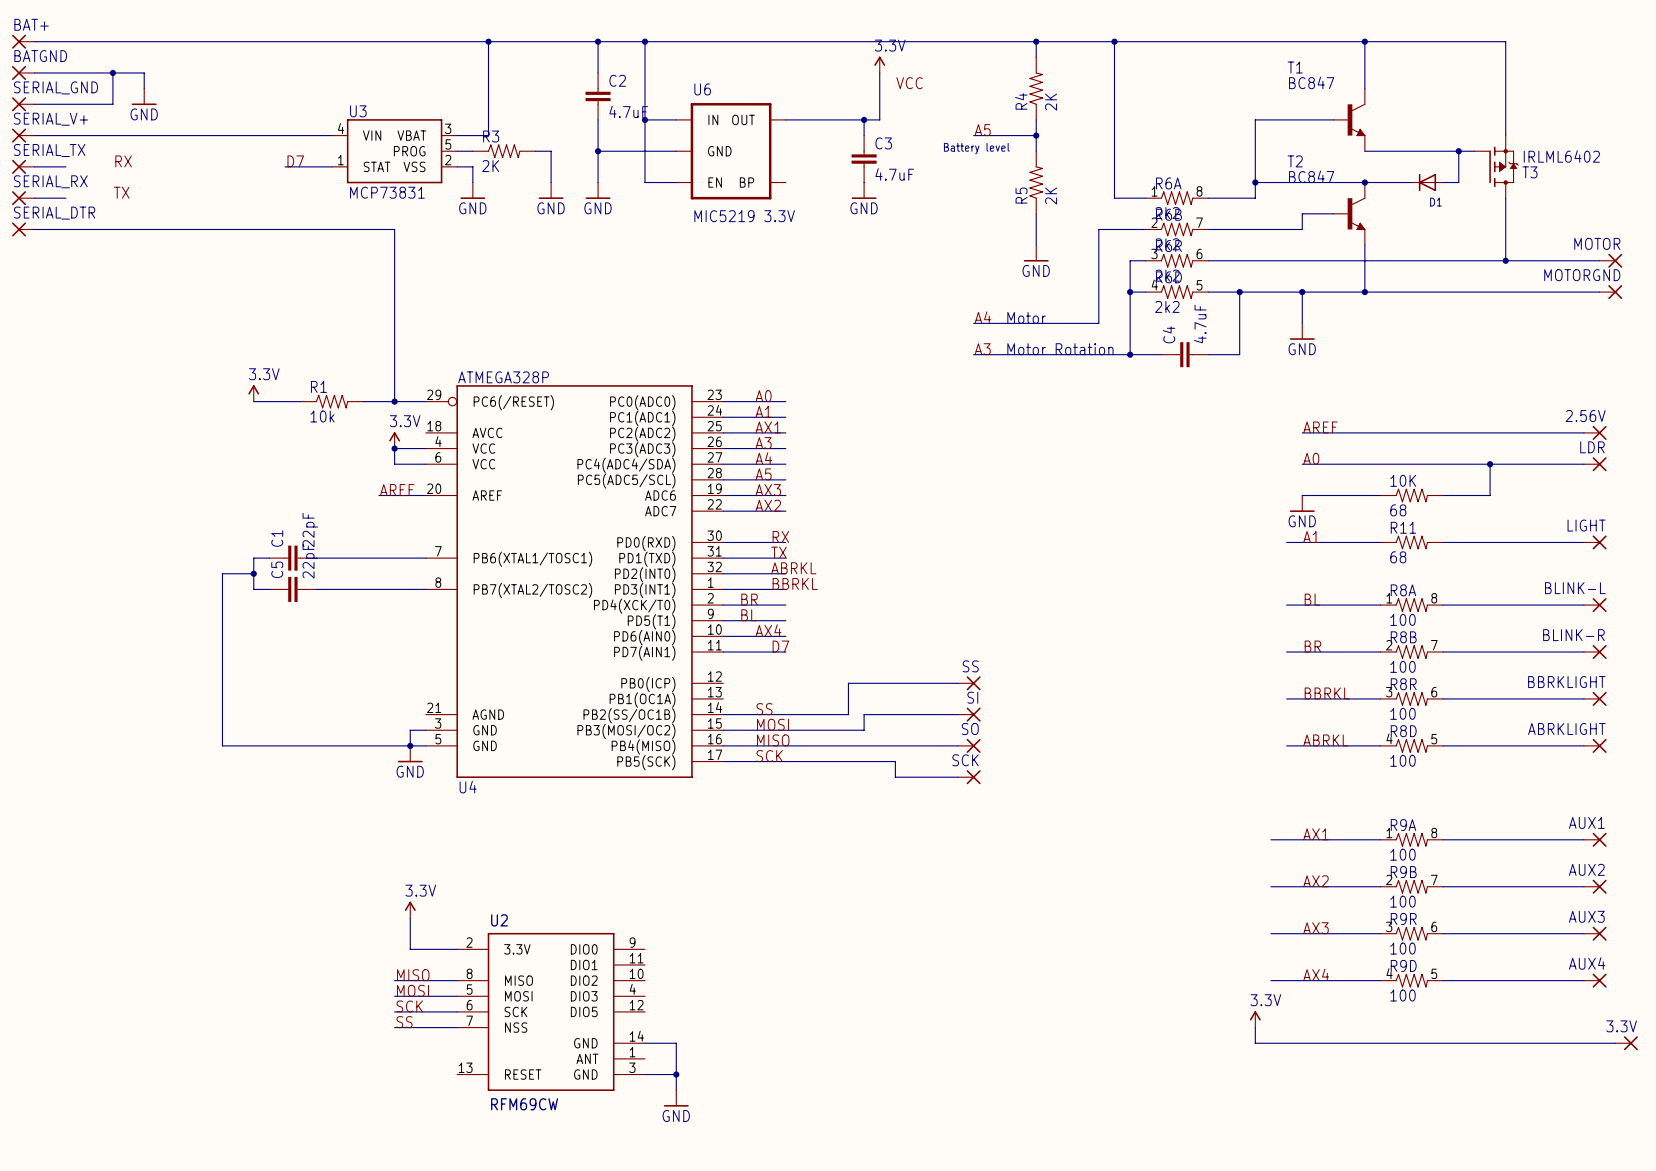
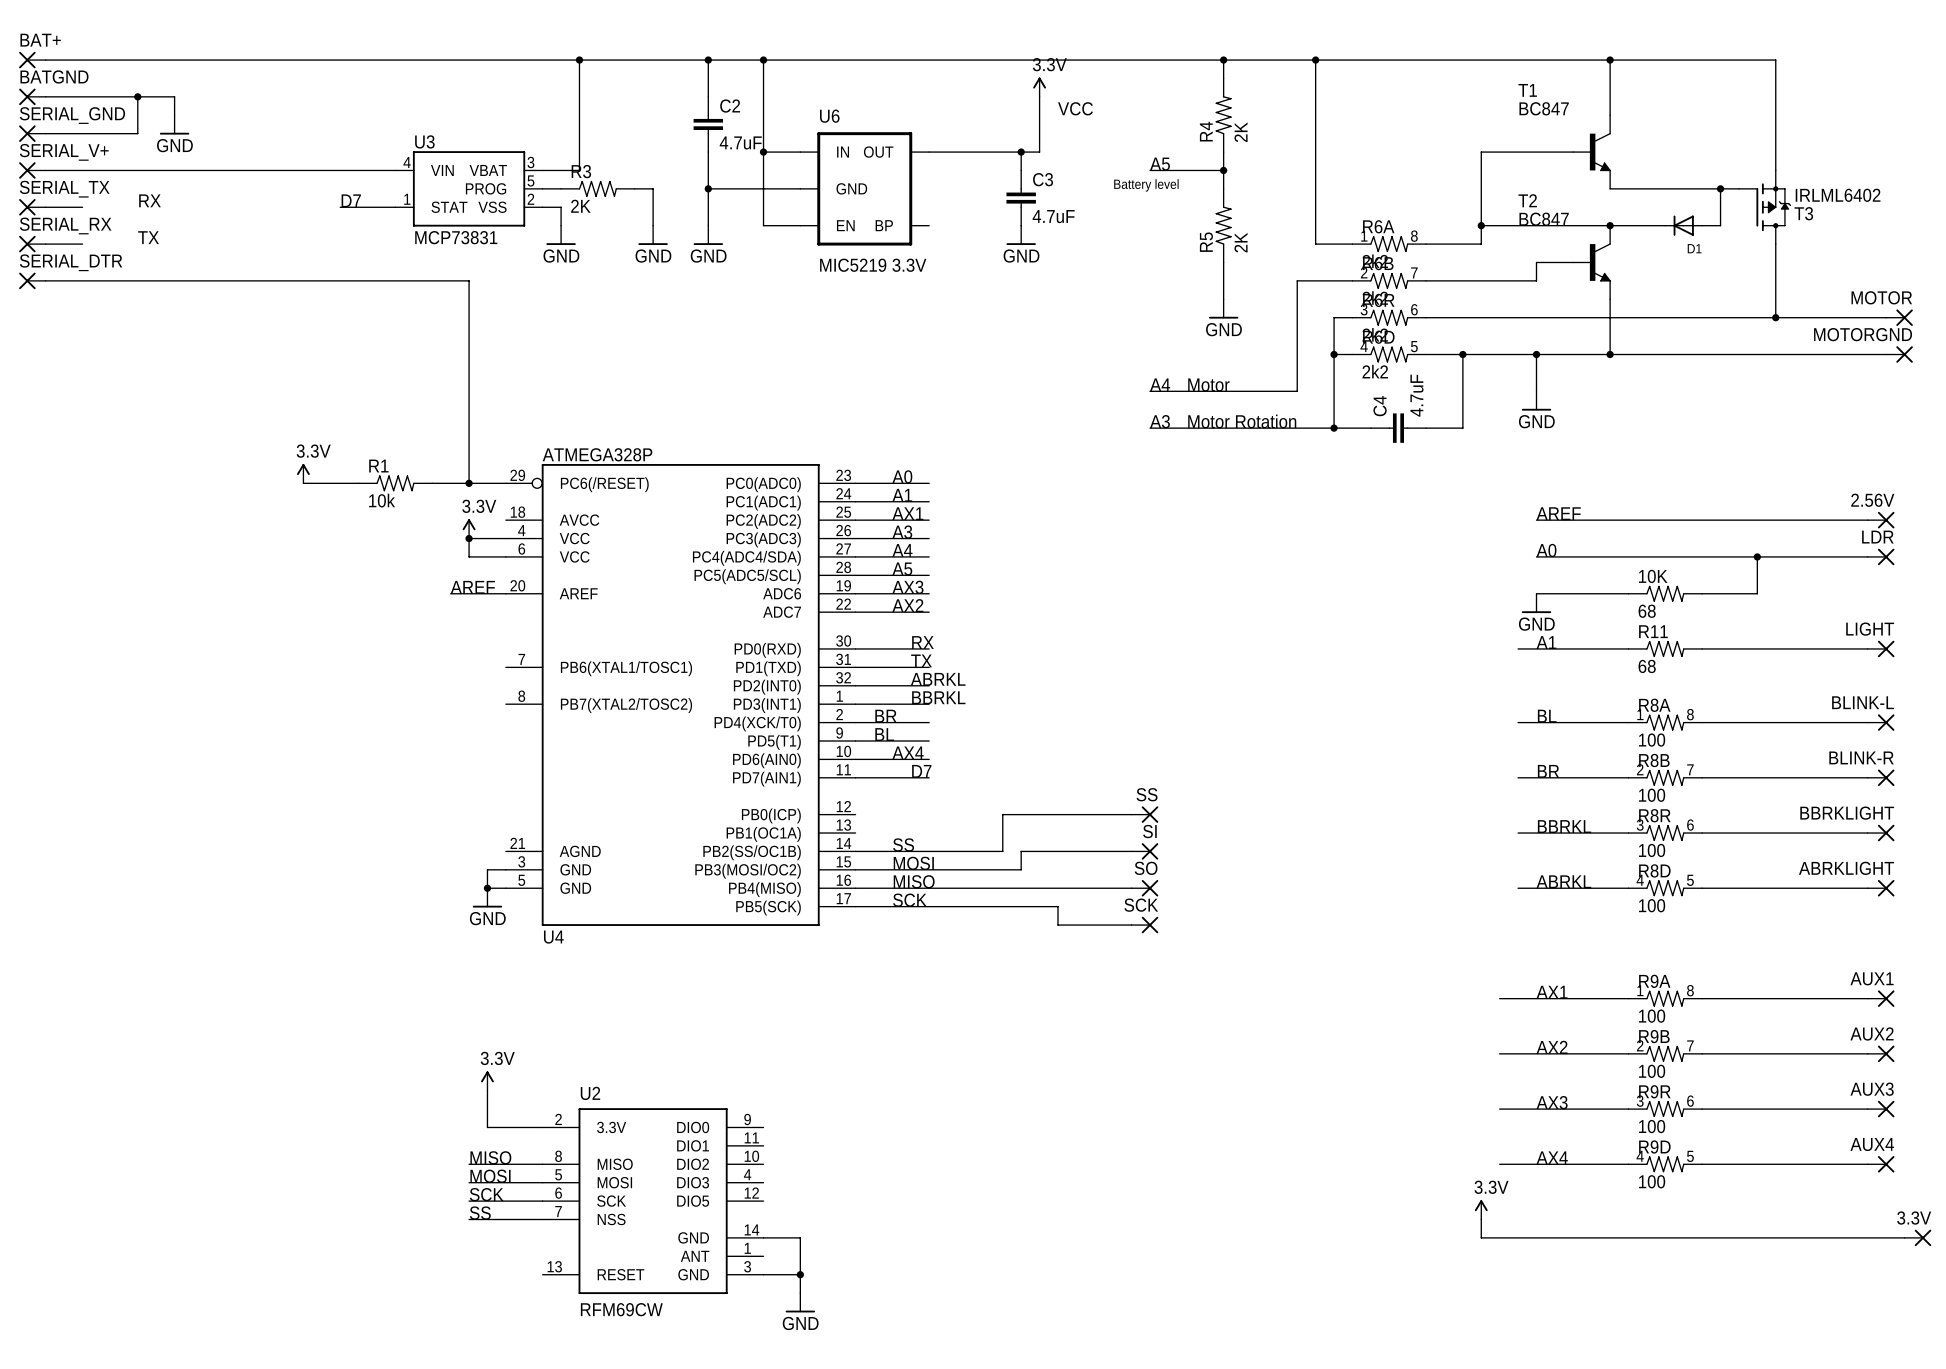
wire: (269, 558) (253, 558) (253, 589) (269, 589) -> none
C1: 22pF (292, 558) -> none
wire: (316, 558) (425, 558) -> none
wire: (253, 573) (222, 573) (222, 745) (410, 745) -> none
junction: (253, 573) -> none
C5: 22pF (292, 589) -> none
wire: (316, 589) (425, 589) -> none

